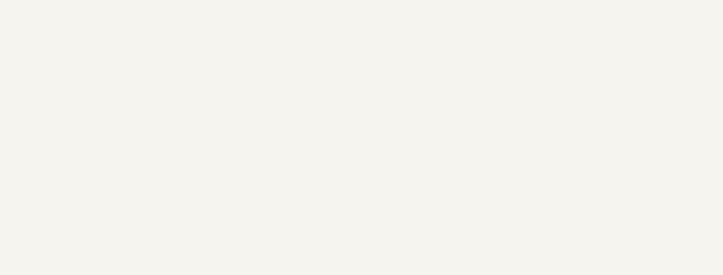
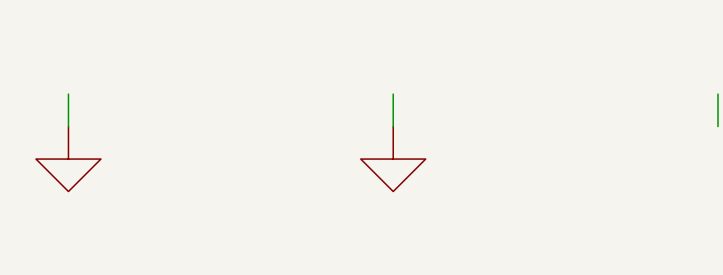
wire: none -> (68, 94) (68, 126)
wire: none -> (393, 94) (393, 126)
wire: none -> (718, 94) (718, 126)
power symbol: none -> (68, 159)
power symbol: none -> (393, 159)

